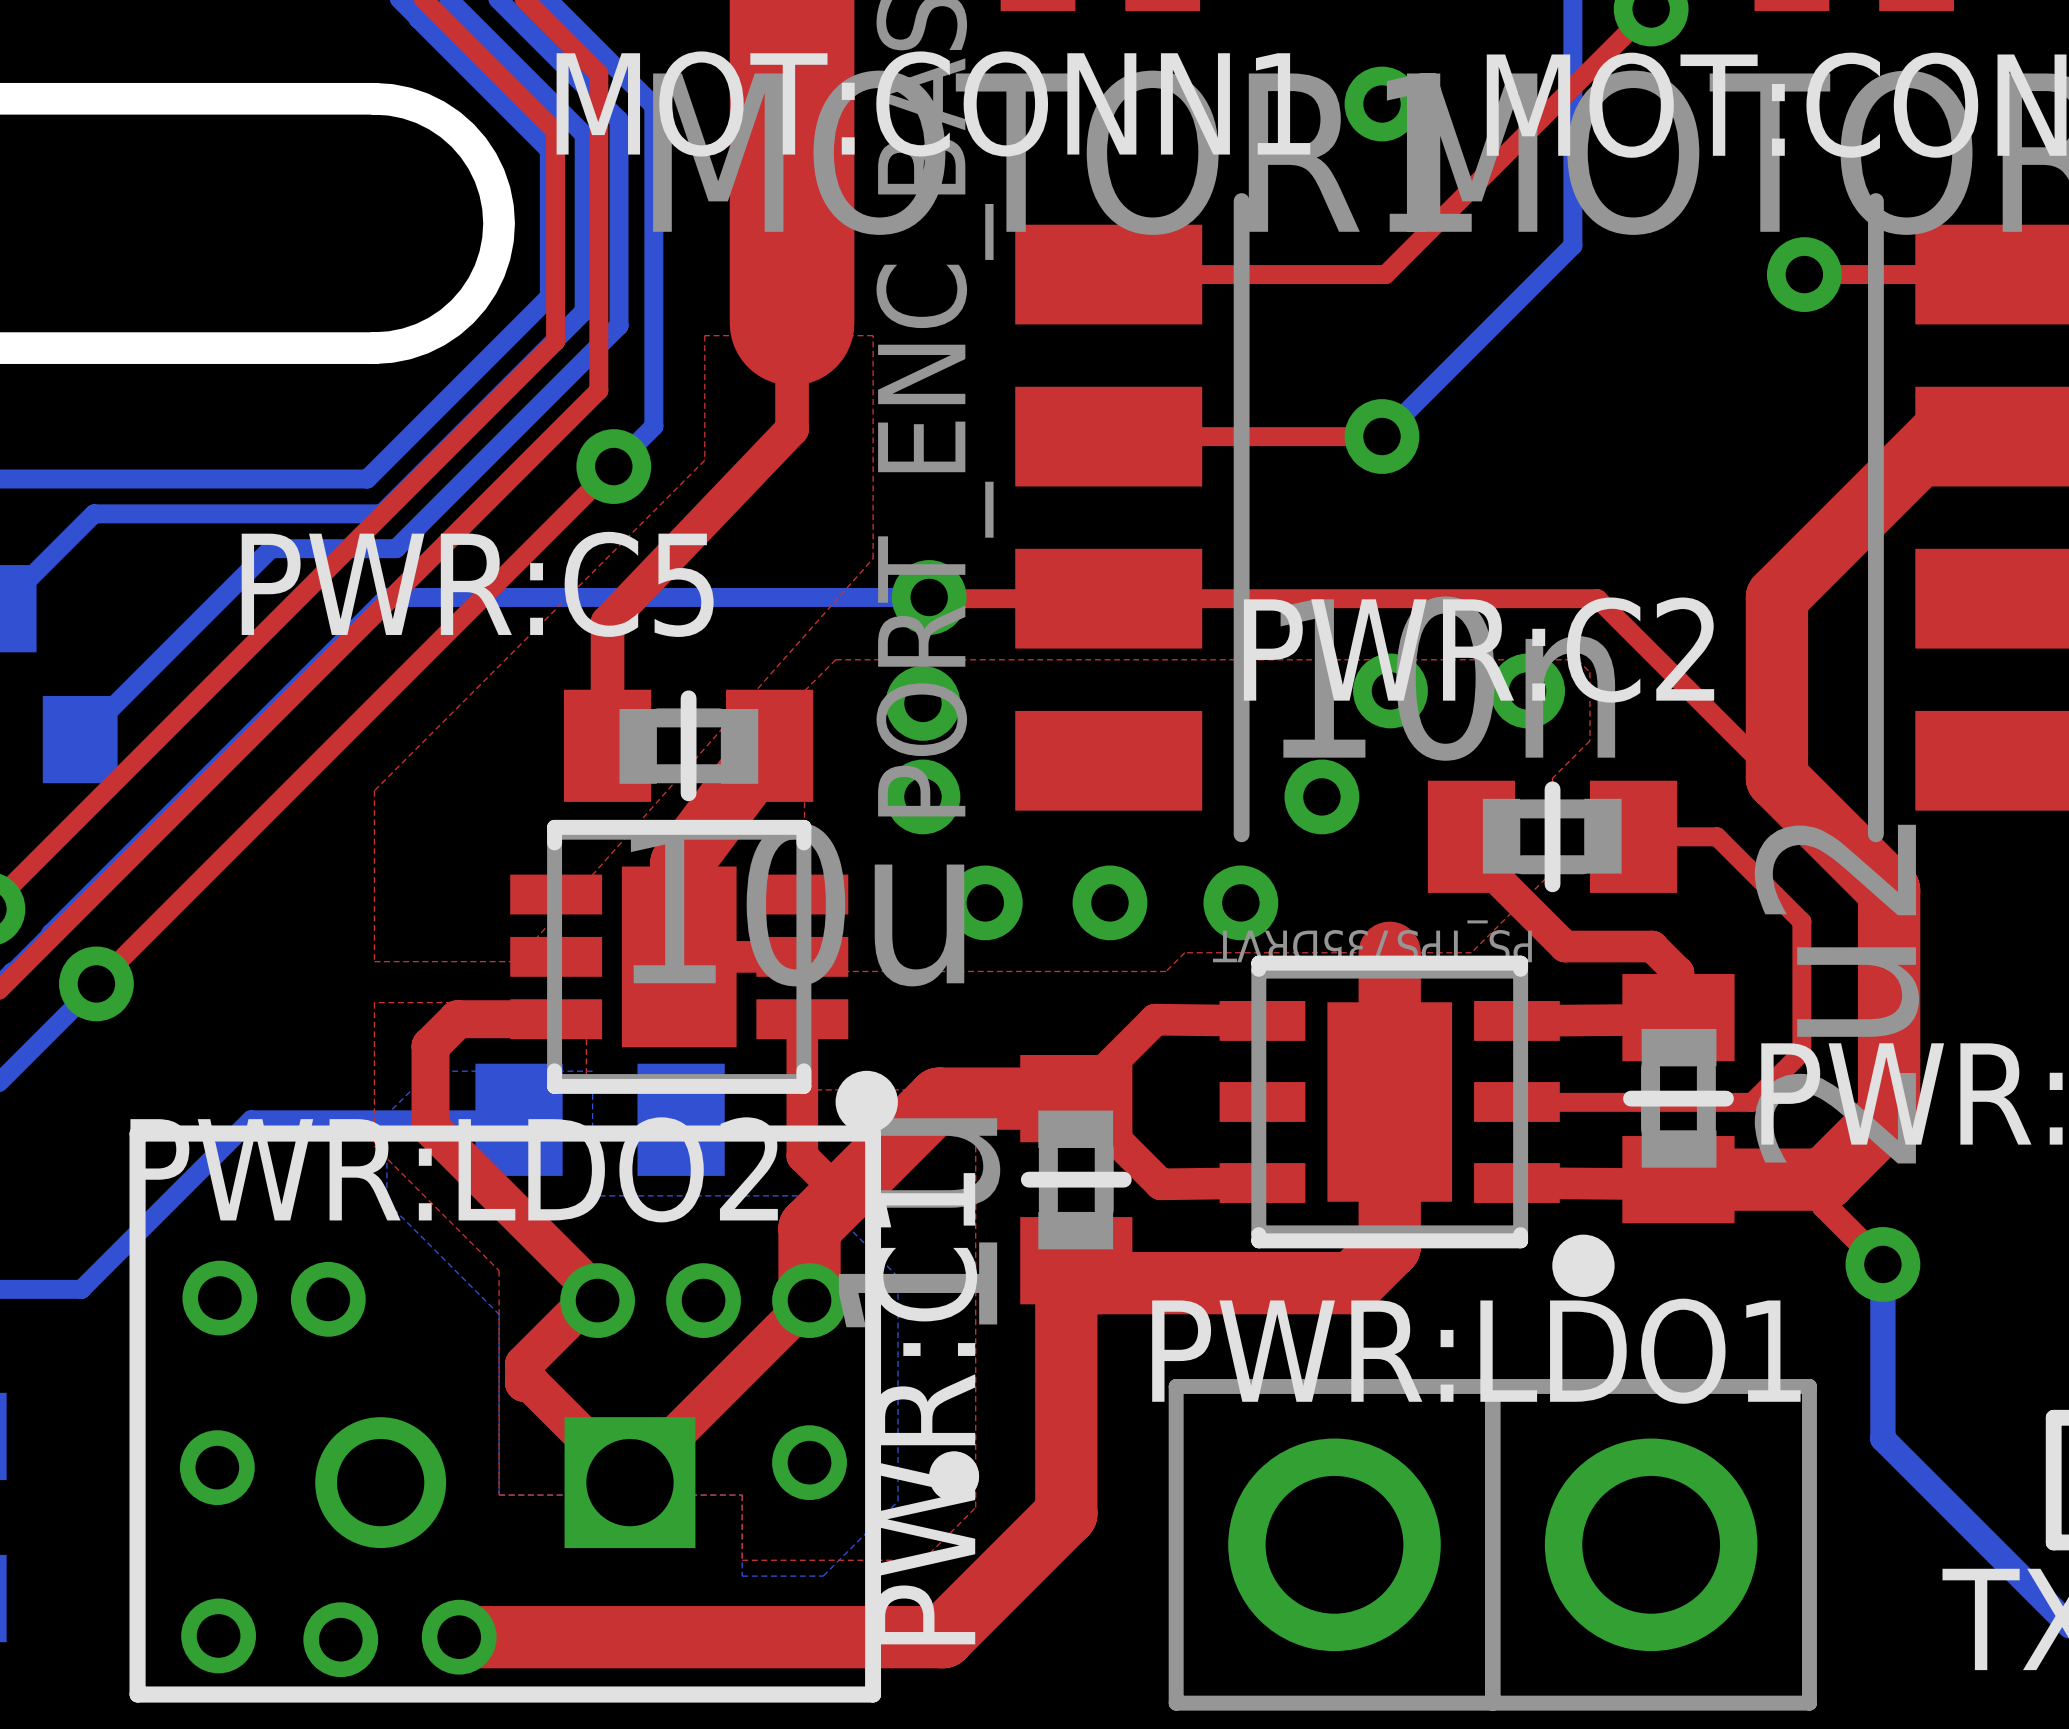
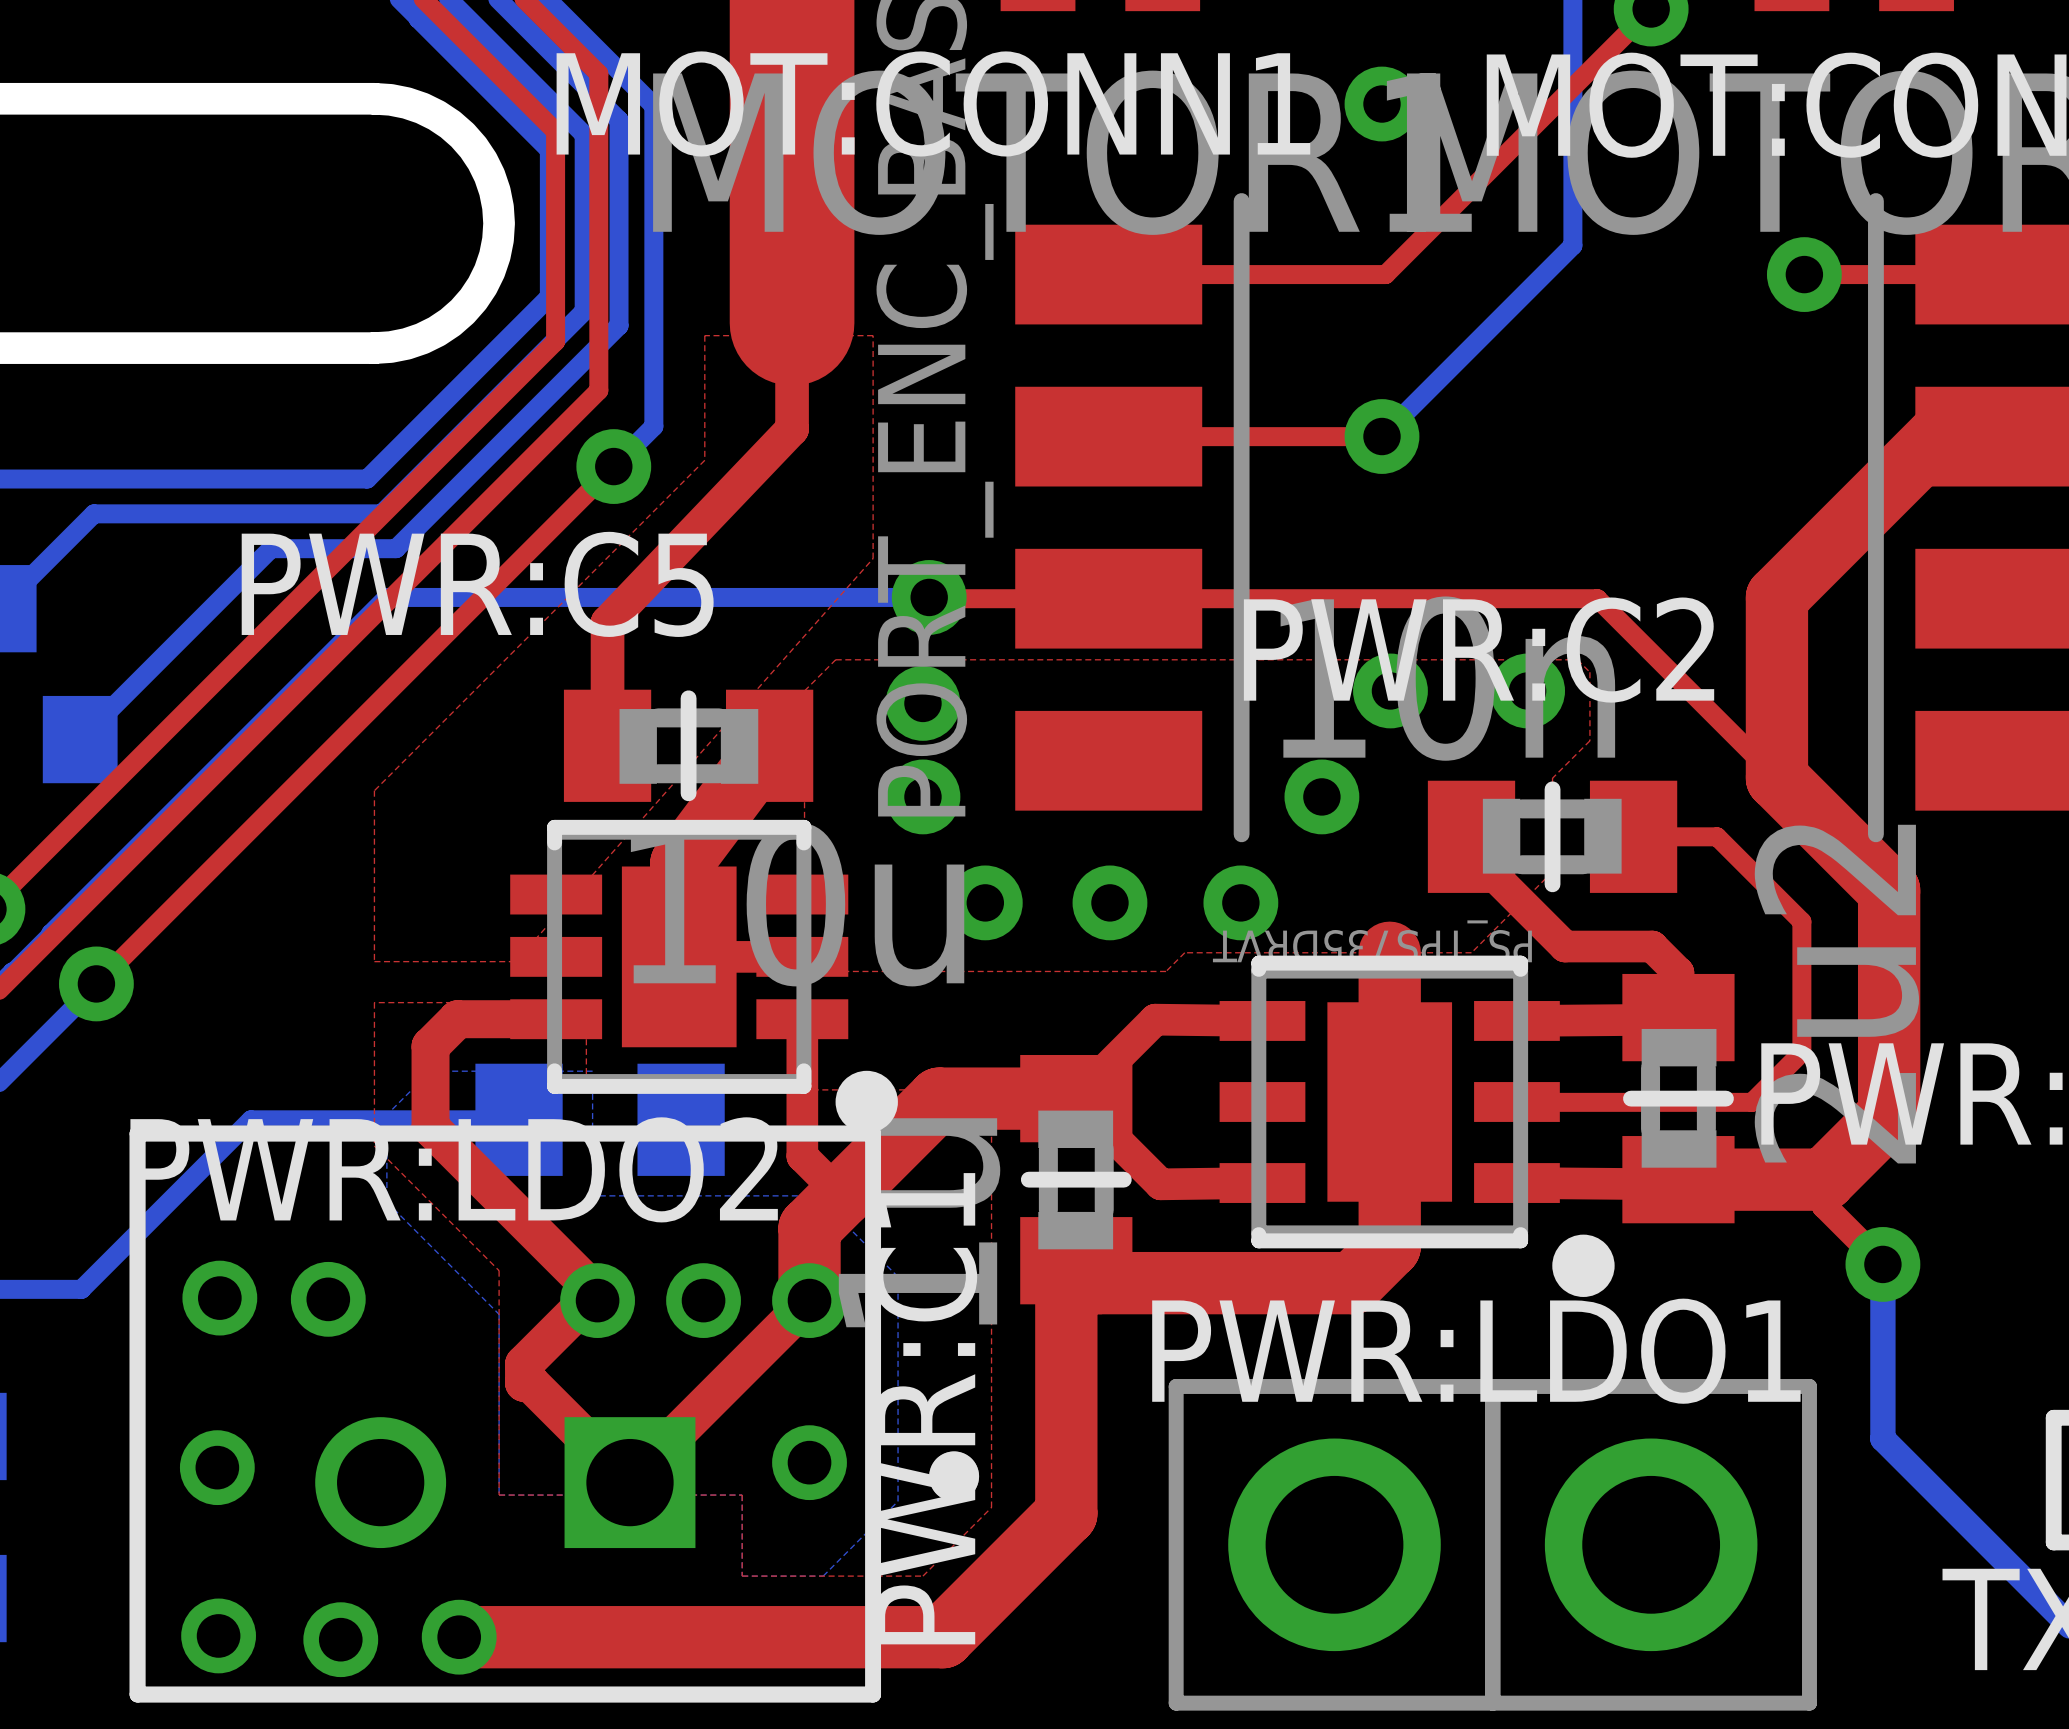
top zone outline: (975, 1089) (975, 1507) (922, 1560) (742, 1560) -> (975, 1089) (991, 1089) (991, 1507) (922, 1576) (742, 1576) (742, 1560)

